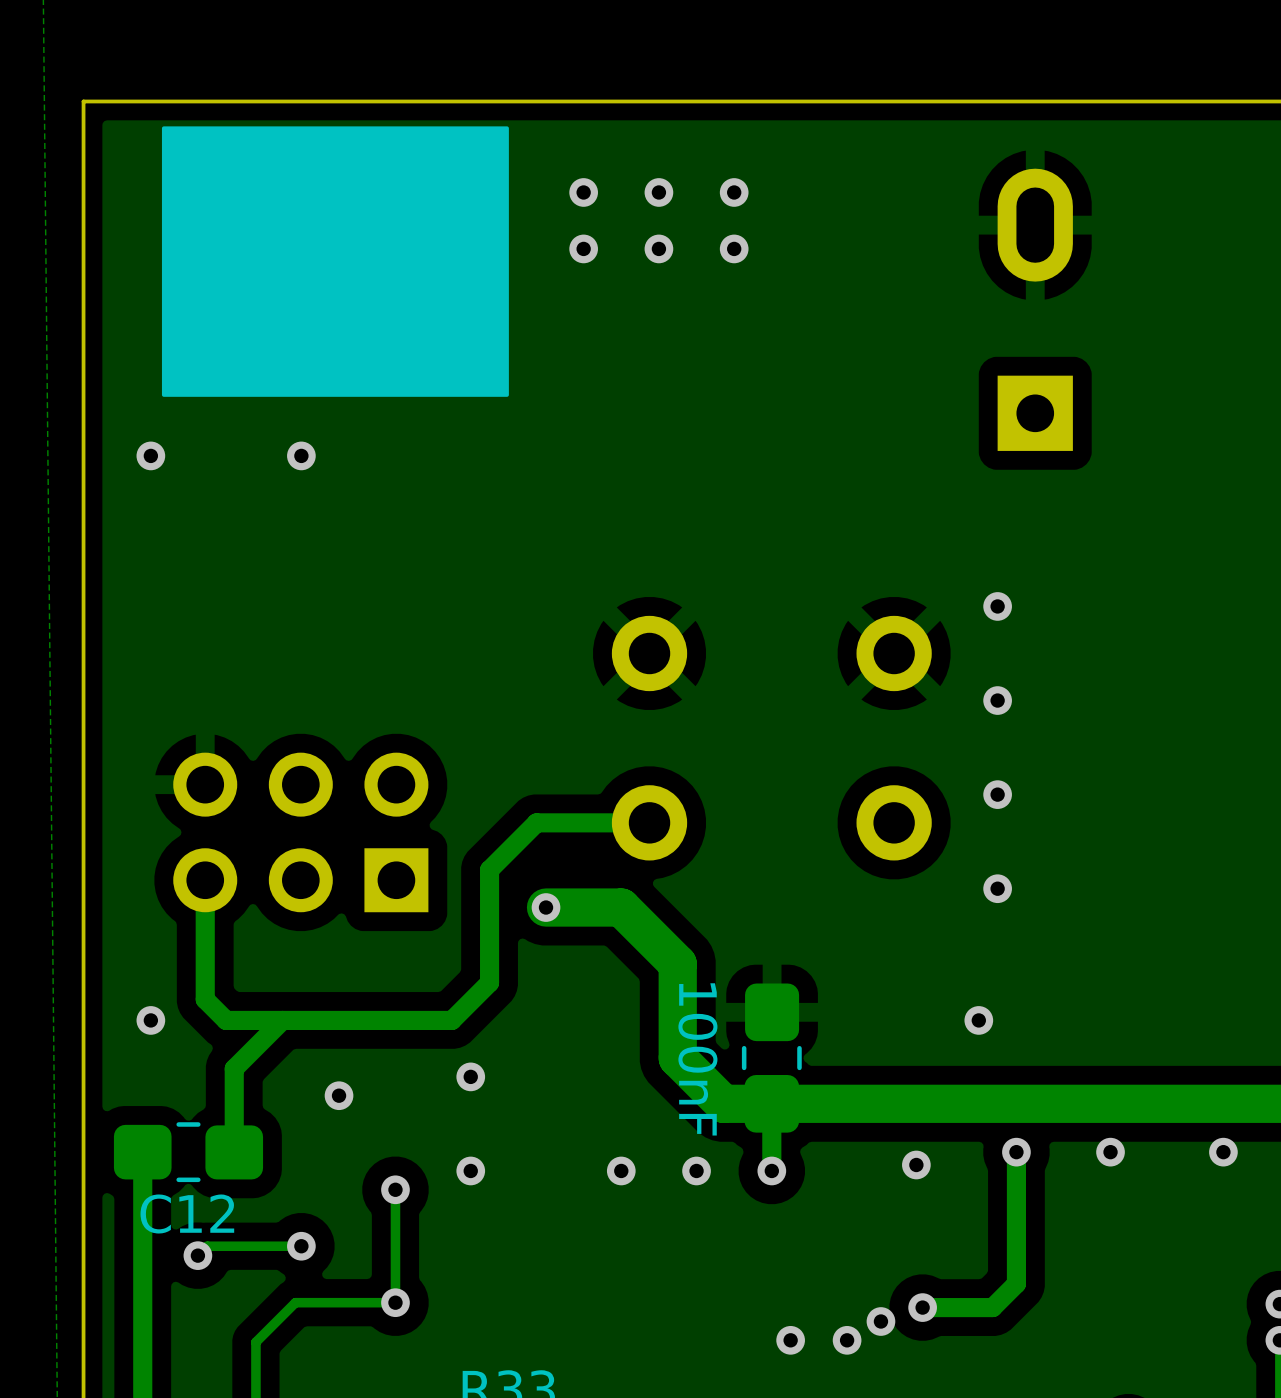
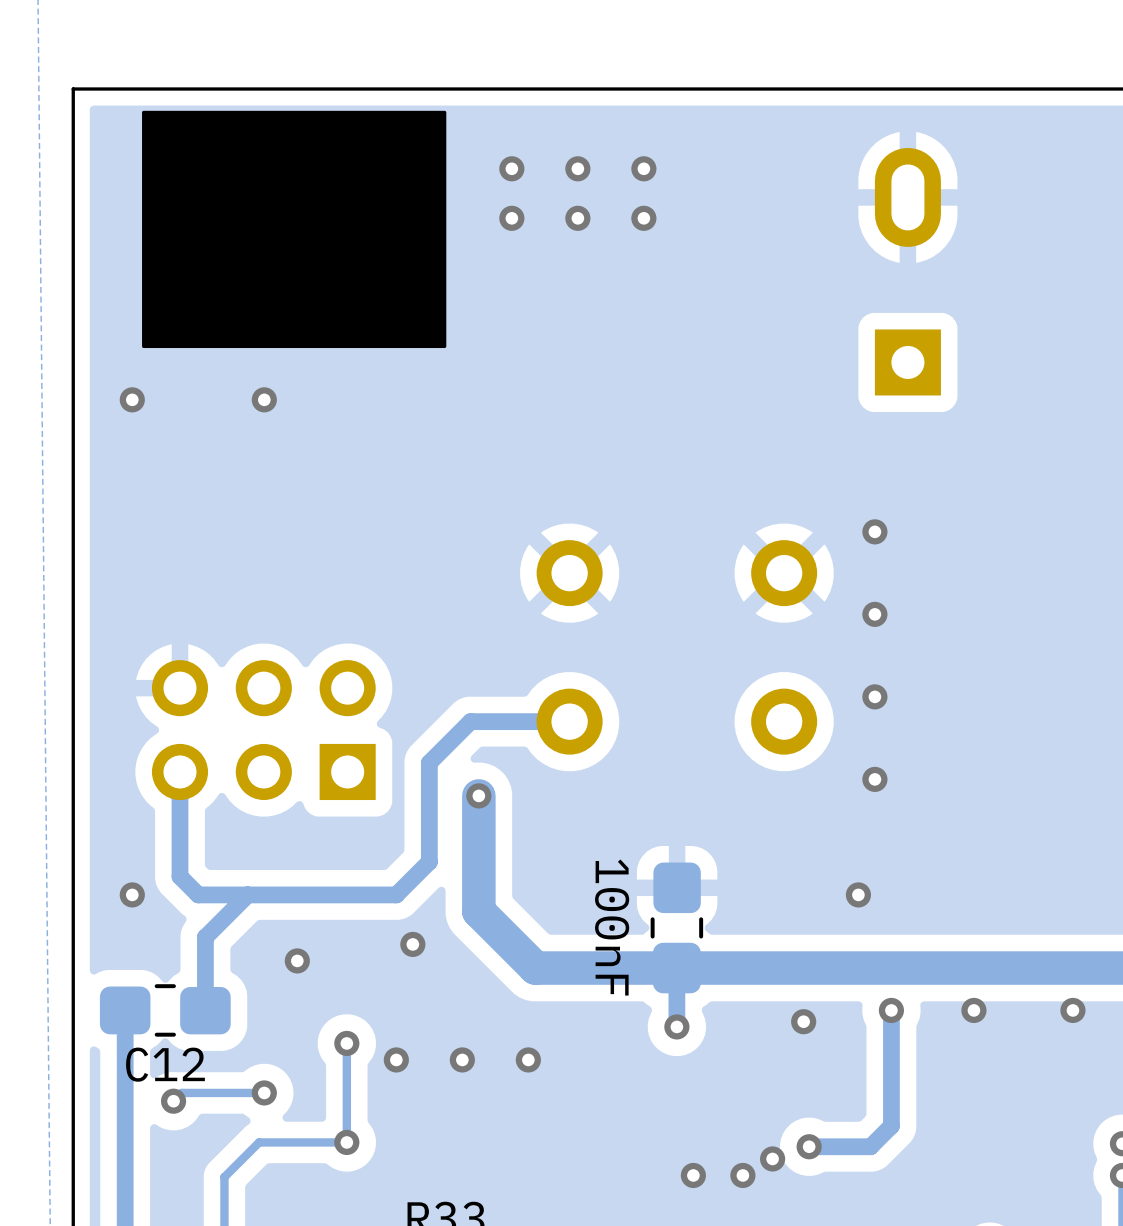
track: (546, 907) (621, 907) (677, 963) (677, 1058) (723, 1103) -> (478, 795) (478, 911) (535, 968) (634, 968)
via: (470, 1170) -> none
via position: (621, 1170) -> (528, 1059)
via: (696, 1170) -> none
via: none -> (396, 1059)
via: none -> (462, 1059)

